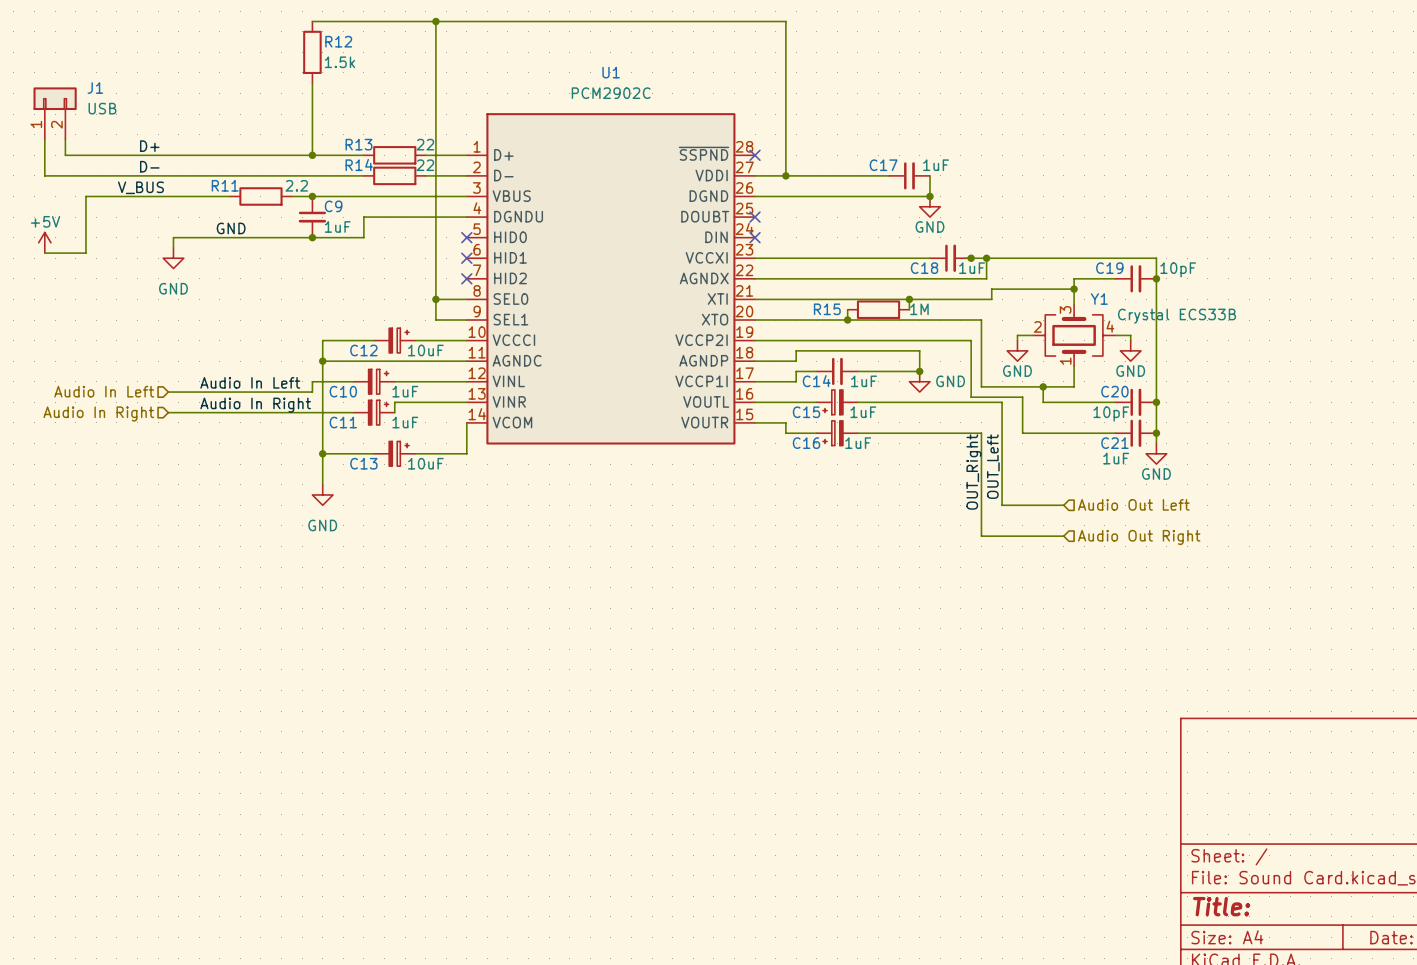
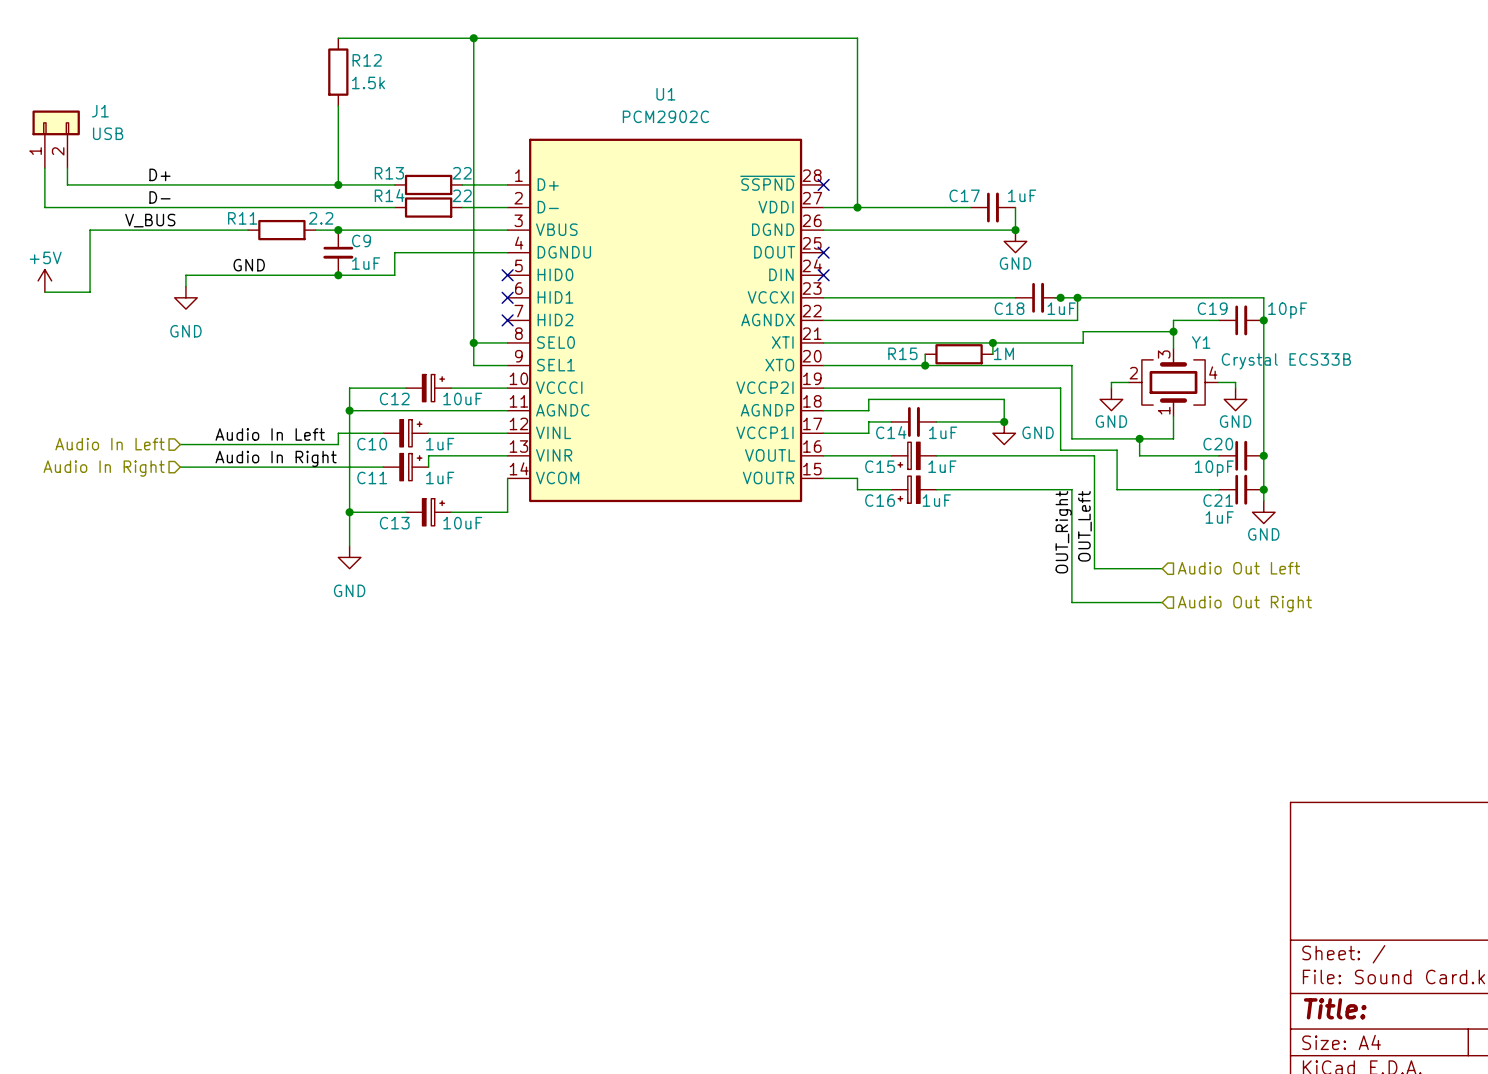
U1 pin name: DOUBT (705, 216) -> DOUT (774, 252)

